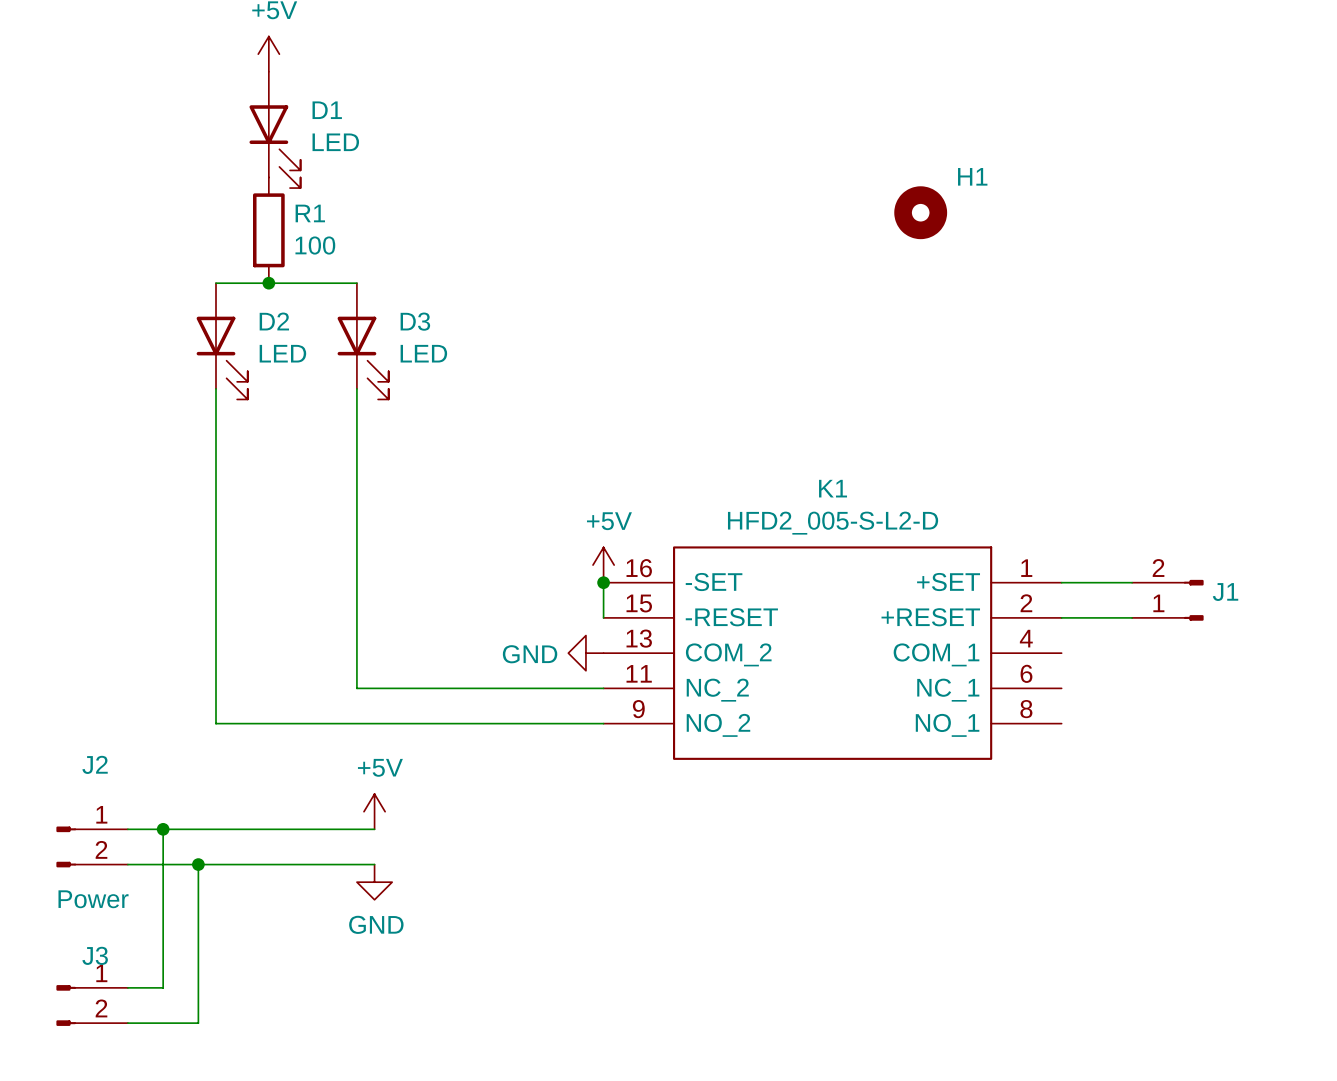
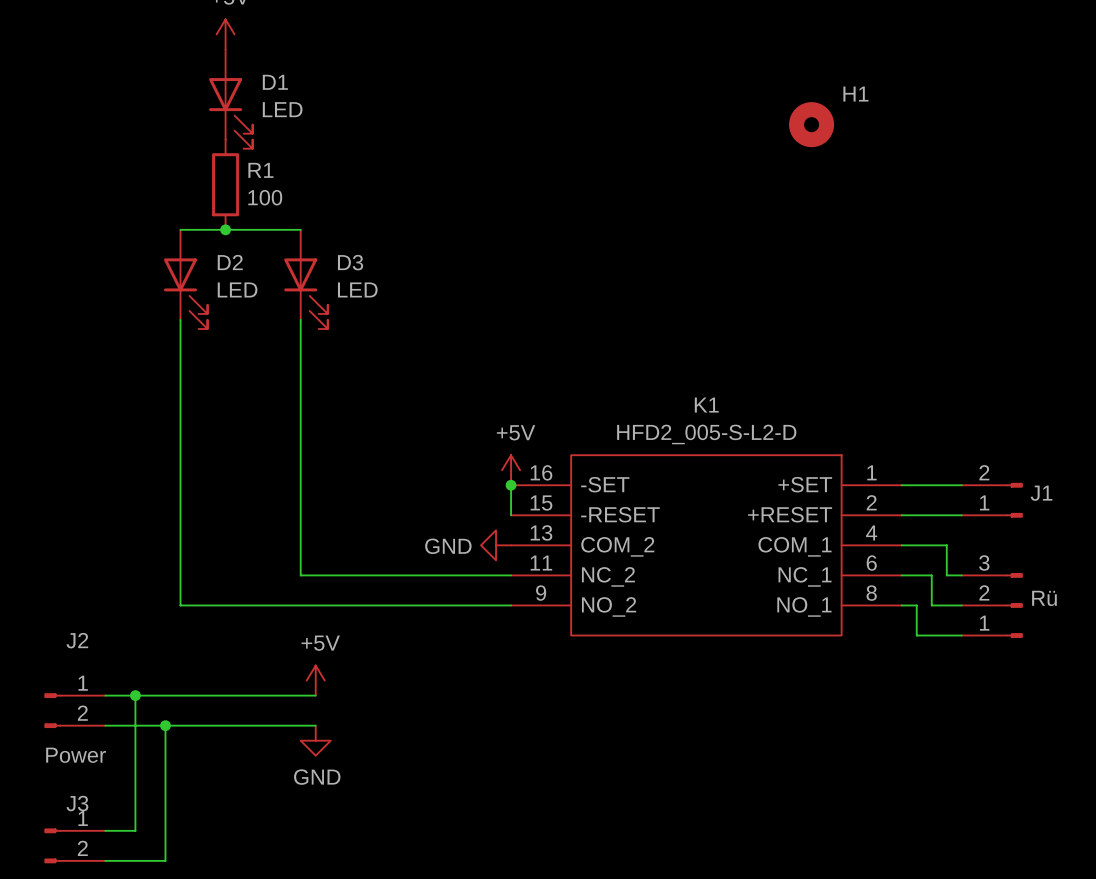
H1 position: (920, 212) -> (811, 124)
wire: none -> (901, 545) (946, 545) (946, 575) (961, 575)
wire: none -> (901, 575) (931, 575) (931, 605) (961, 605)
wire: none -> (901, 605) (916, 605) (916, 635) (961, 635)
Rü: none -> (992, 605)

